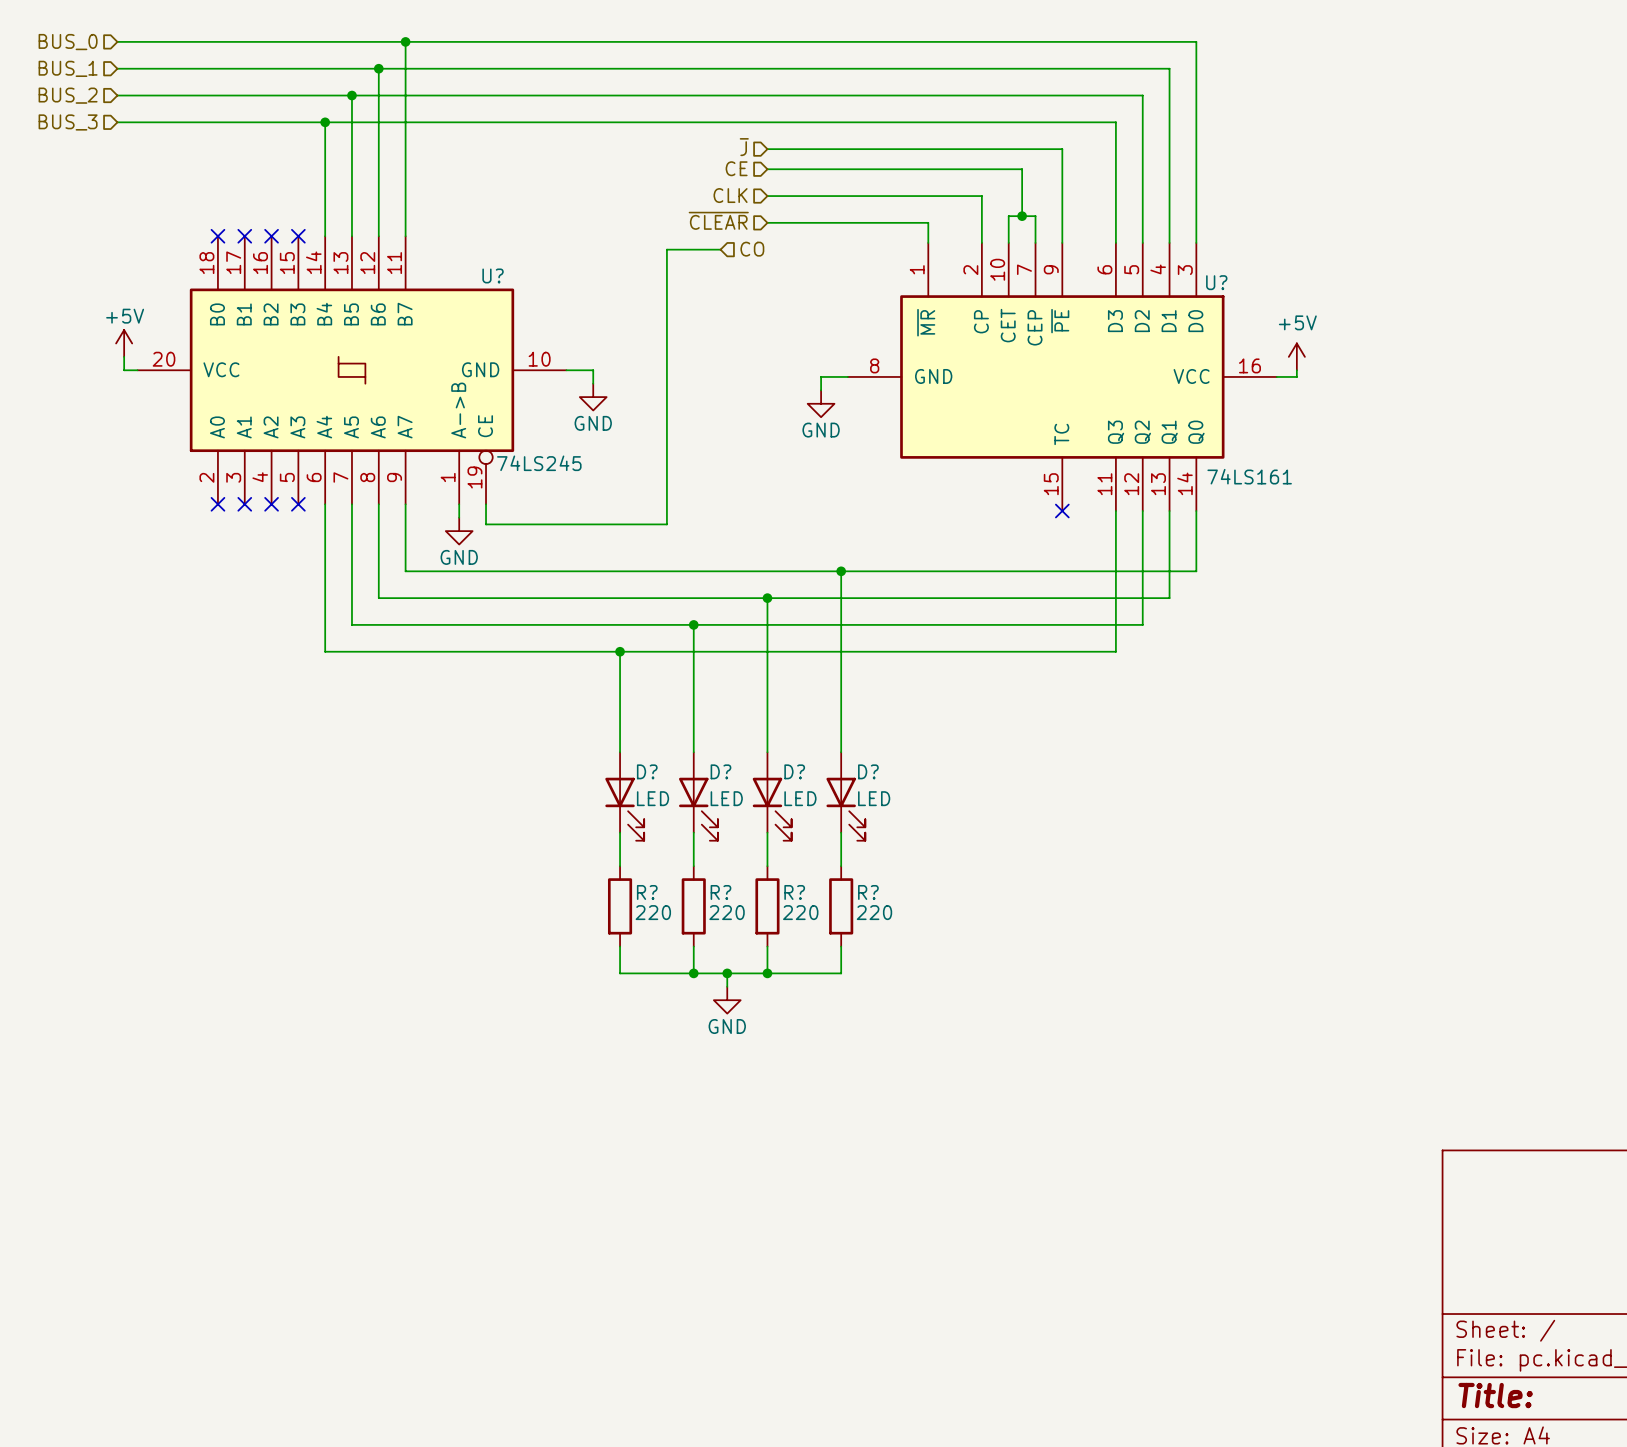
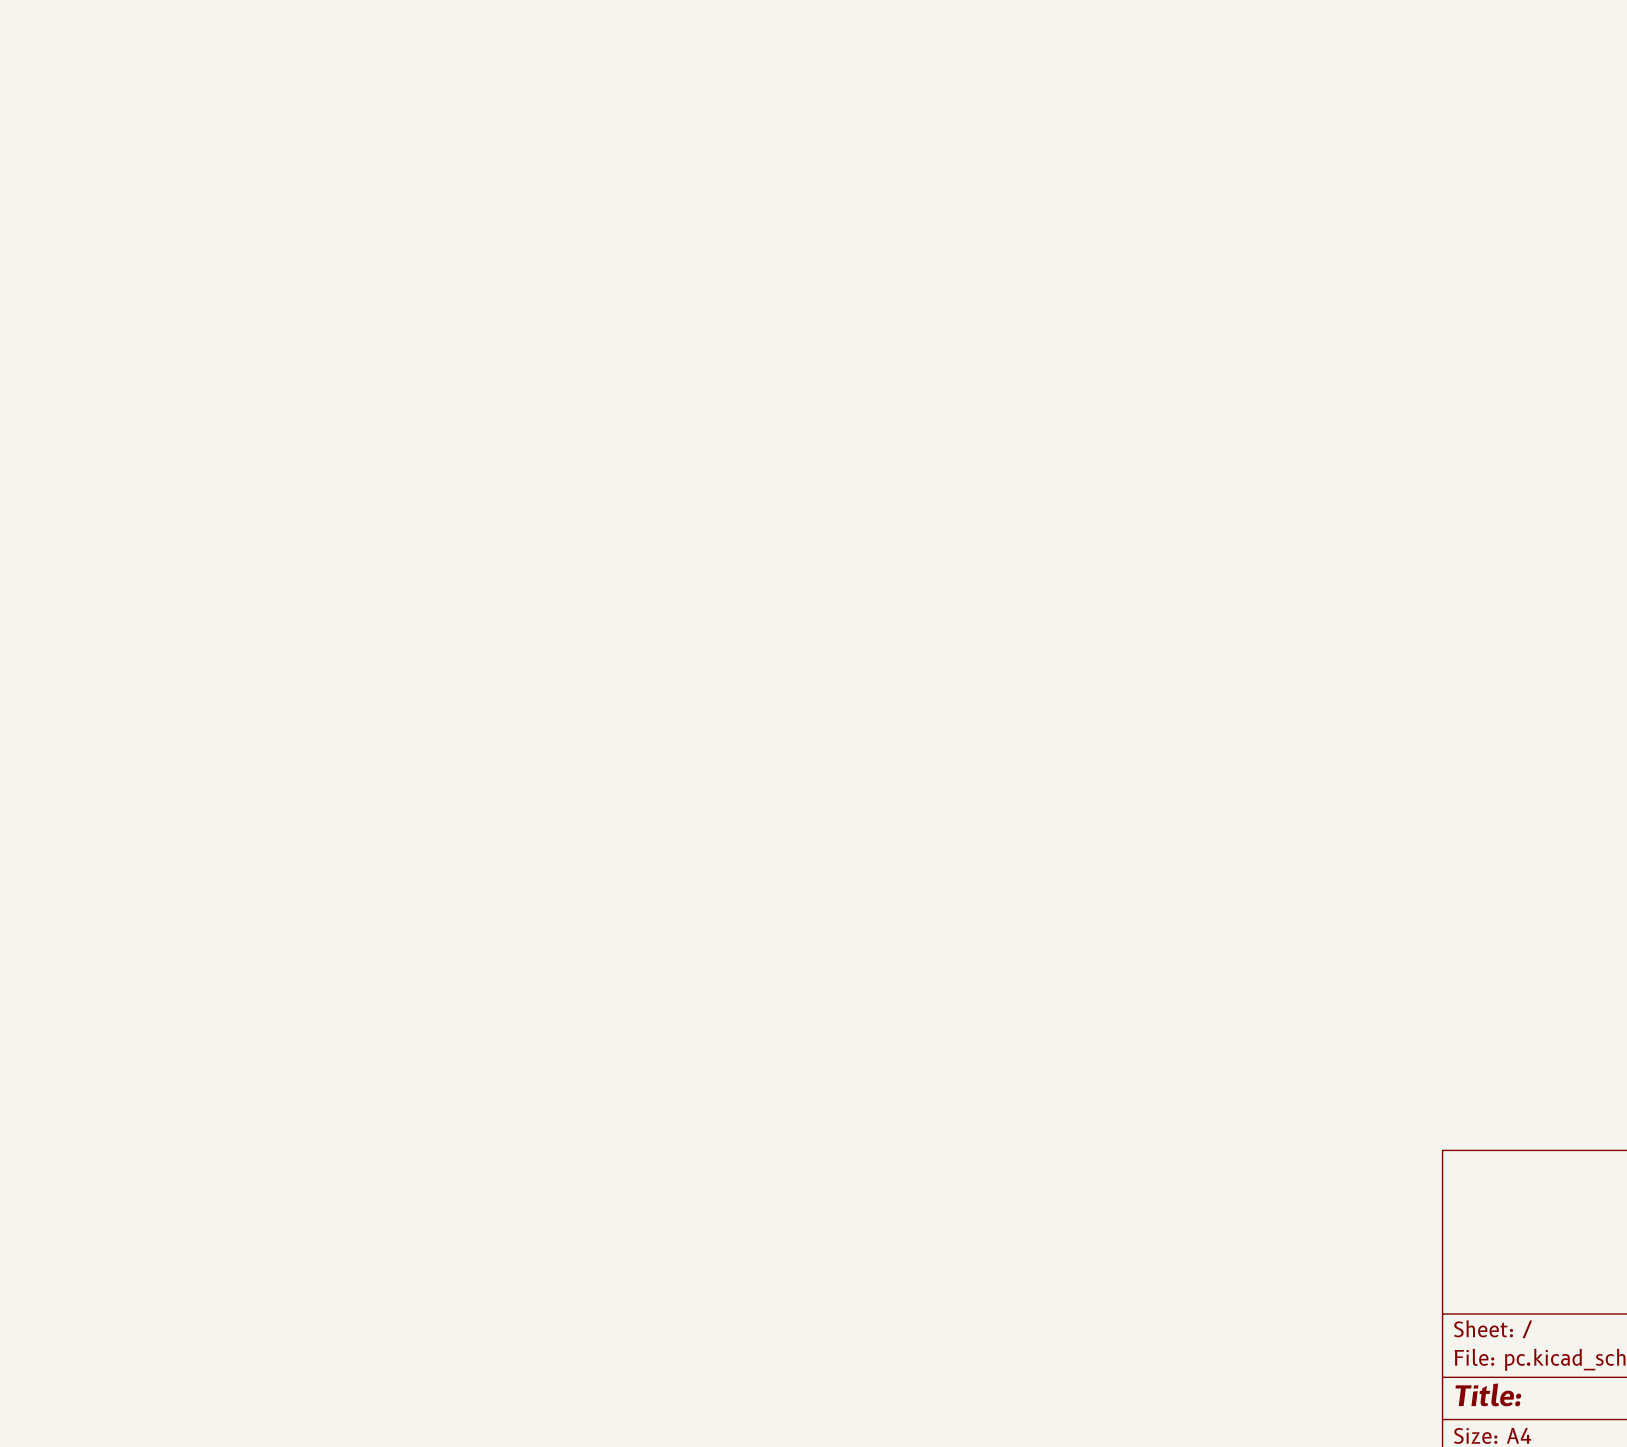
wire: (117, 41) (1196, 41) (1196, 242) -> none
wire: (405, 41) (405, 236) -> none
junction: (405, 41) -> none
hierarchical label: BUS_0 (68, 42) -> none
hierarchical label: BUS_1 (68, 68) -> none
wire: (117, 68) (1169, 68) (1169, 242) -> none
wire: (378, 68) (378, 236) -> none
junction: (378, 68) -> none
hierarchical label: BUS_2 (68, 95) -> none
wire: (117, 95) (1142, 95) (1142, 242) -> none
wire: (351, 95) (351, 236) -> none
junction: (351, 95) -> none
hierarchical label: BUS_3 (68, 122) -> none
wire: (117, 122) (1115, 122) (1115, 242) -> none
wire: (325, 122) (325, 236) -> none
junction: (325, 122) -> none
hierarchical label: ~{J} (744, 147) -> none
wire: (767, 149) (1062, 149) (1062, 242) -> none
hierarchical label: CE (736, 168) -> none
wire: (767, 169) (1022, 169) (1022, 216) -> none
hierarchical label: CLK (730, 195) -> none
wire: (767, 196) (981, 196) (981, 242) -> none
junction: (1022, 216) -> none
hierarchical label: ~{CLEAR} (718, 220) -> none
wire: (767, 222) (928, 222) (928, 242) -> none
no-connect mark: (217, 236) -> none
no-connect mark: (244, 236) -> none
no-connect mark: (271, 236) -> none
no-connect mark: (298, 236) -> none
wire: (1008, 242) (1008, 216) (1035, 216) (1035, 242) -> none
wire: (720, 249) (666, 249) (666, 524) (486, 524) (486, 504) -> none
hierarchical label: CO (752, 249) -> none
power symbol: +5V (124, 343) -> none
wire: (124, 356) (124, 370) (137, 370) -> none
power symbol: +5V (1296, 356) -> none
U?: 74LS245 (351, 370) -> none
wire: (566, 370) (593, 370) (593, 383) -> none
wire: (1296, 370) (1296, 376) (1276, 376) -> none
wire: (847, 376) (821, 376) (821, 390) -> none
U?: 74LS161 (1062, 376) -> none
power symbol: GND (593, 397) -> none
power symbol: GND (821, 403) -> none
no-connect mark: (217, 504) -> none
no-connect mark: (244, 504) -> none
no-connect mark: (271, 504) -> none
no-connect mark: (298, 504) -> none
wire: (325, 504) (325, 651) (1115, 651) (1115, 511) -> none
wire: (351, 504) (351, 624) (1142, 624) (1142, 511) -> none
wire: (378, 504) (378, 598) (1169, 598) (1169, 511) -> none
wire: (405, 504) (405, 571) (1196, 571) (1196, 511) -> none
wire: (459, 504) (459, 517) -> none
no-connect mark: (1062, 511) -> none
power symbol: GND (459, 531) -> none
wire: (841, 571) (841, 752) -> none
junction: (841, 571) -> none
wire: (767, 598) (767, 752) -> none
junction: (767, 598) -> none
wire: (693, 624) (693, 752) -> none
junction: (693, 624) -> none
wire: (620, 651) (620, 752) -> none
junction: (620, 651) -> none
D?: LED (624, 796) -> none
D?: LED (698, 796) -> none
D?: LED (772, 796) -> none
D?: LED (845, 796) -> none
wire: (620, 832) (620, 866) -> none
wire: (693, 832) (693, 866) -> none
wire: (767, 832) (767, 866) -> none
wire: (841, 832) (841, 866) -> none
R?: 220 (620, 906) -> none
R?: 220 (693, 906) -> none
R?: 220 (767, 906) -> none
R?: 220 (841, 906) -> none
wire: (620, 946) (620, 973) (841, 973) (841, 946) -> none
wire: (693, 946) (693, 973) -> none
wire: (767, 946) (767, 973) -> none
junction: (693, 973) -> none
wire: (727, 973) (727, 986) -> none
junction: (727, 973) -> none
junction: (767, 973) -> none
power symbol: GND (727, 1000) -> none

